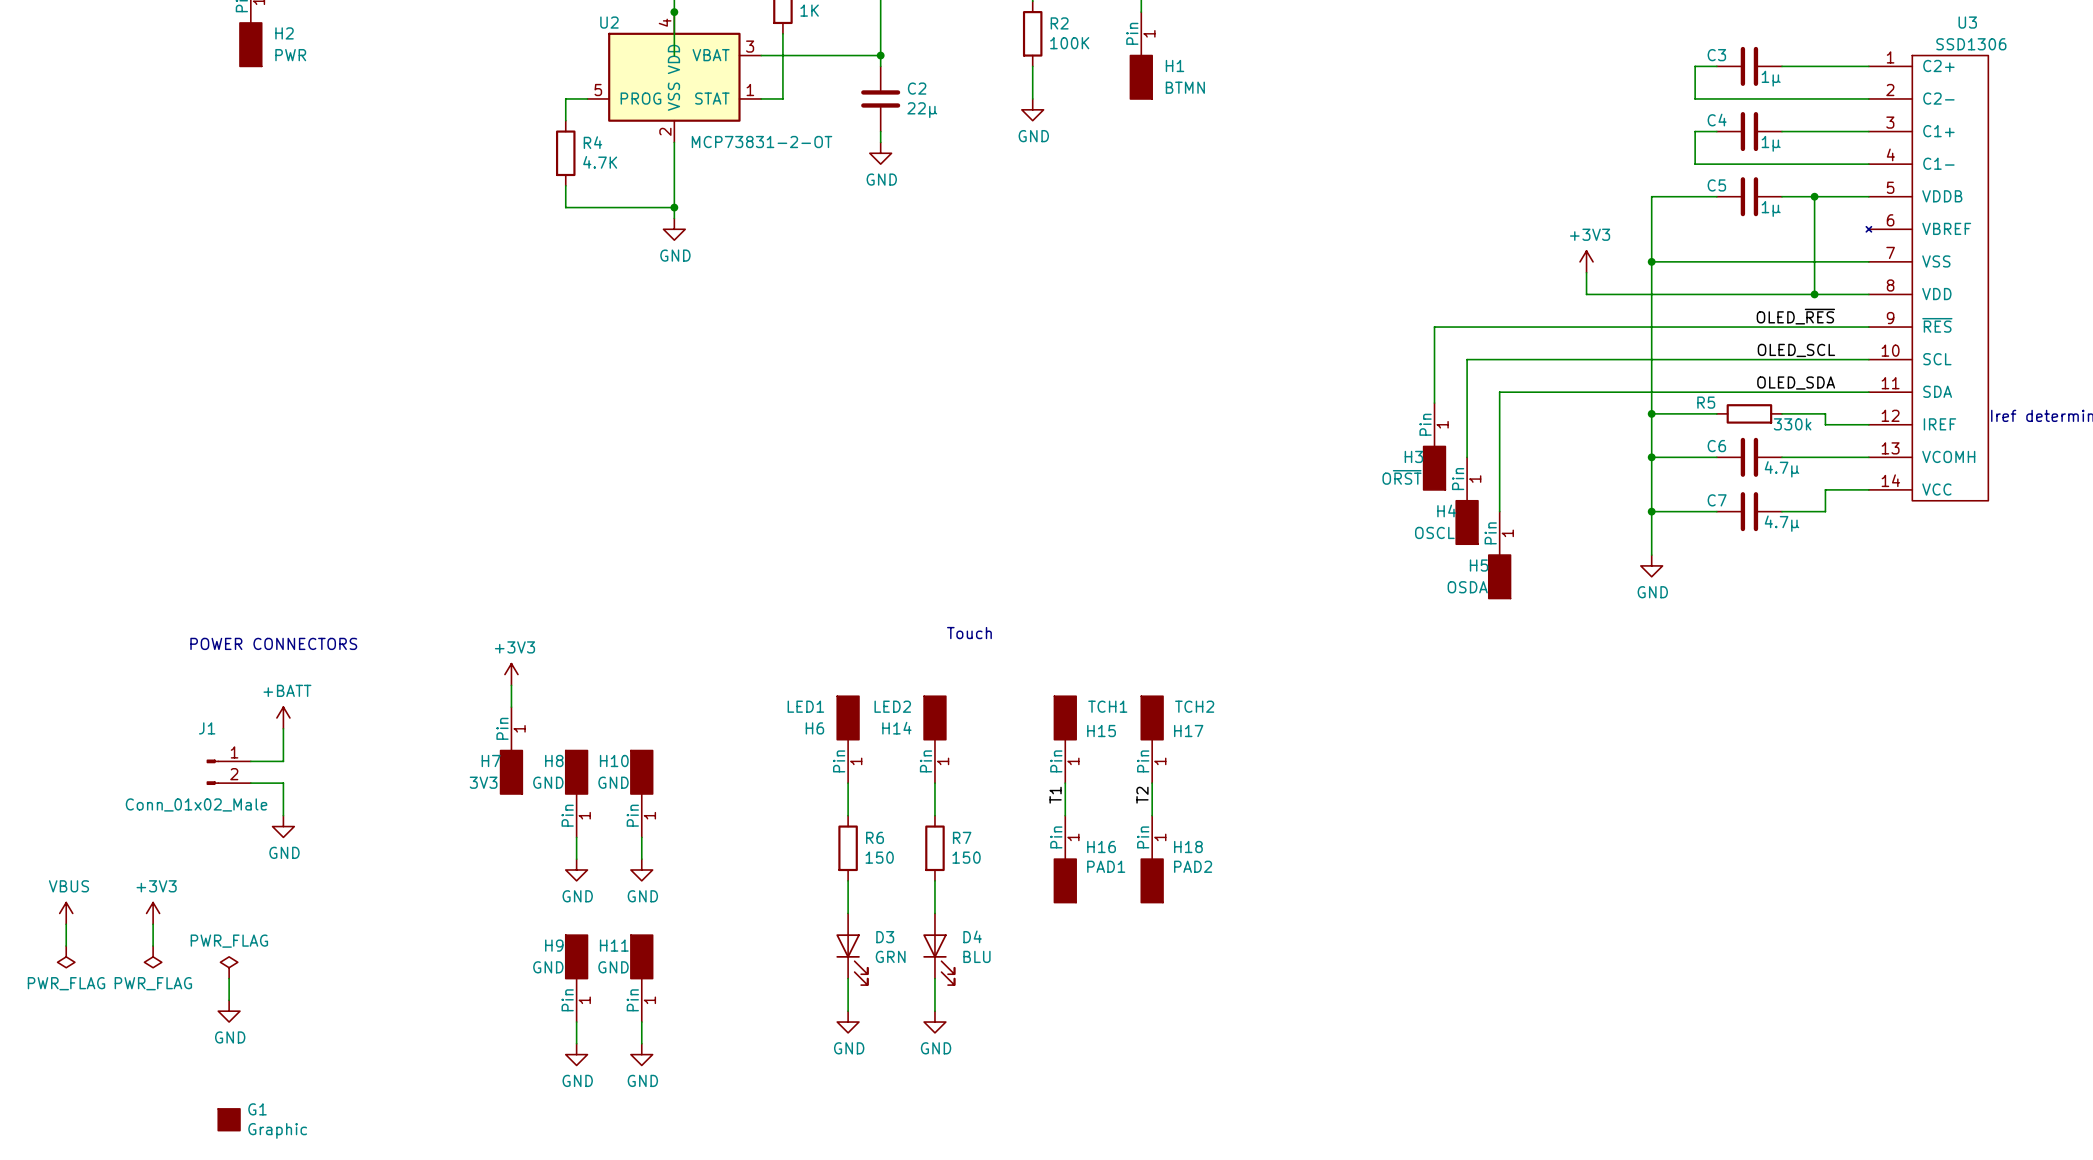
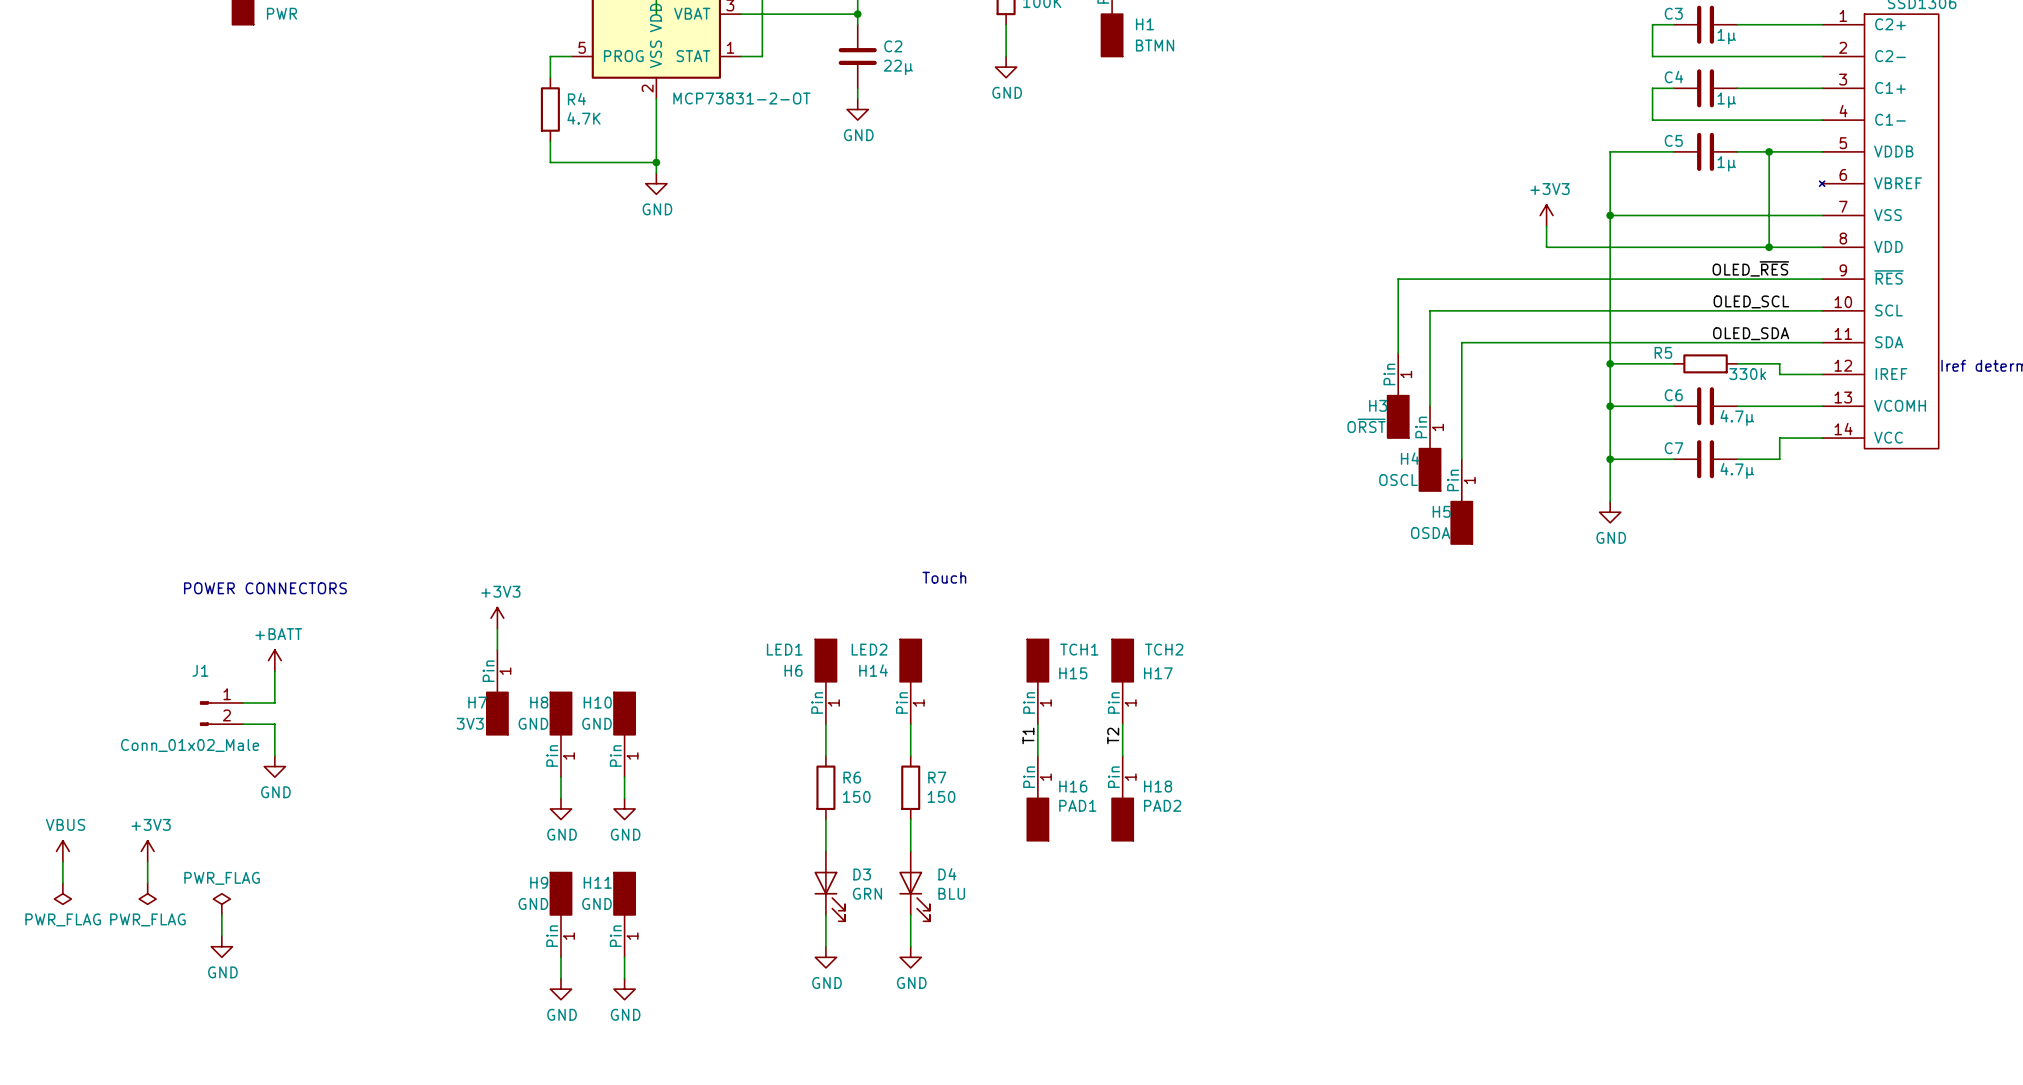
G1: Graphic (229, 1119) -> none

